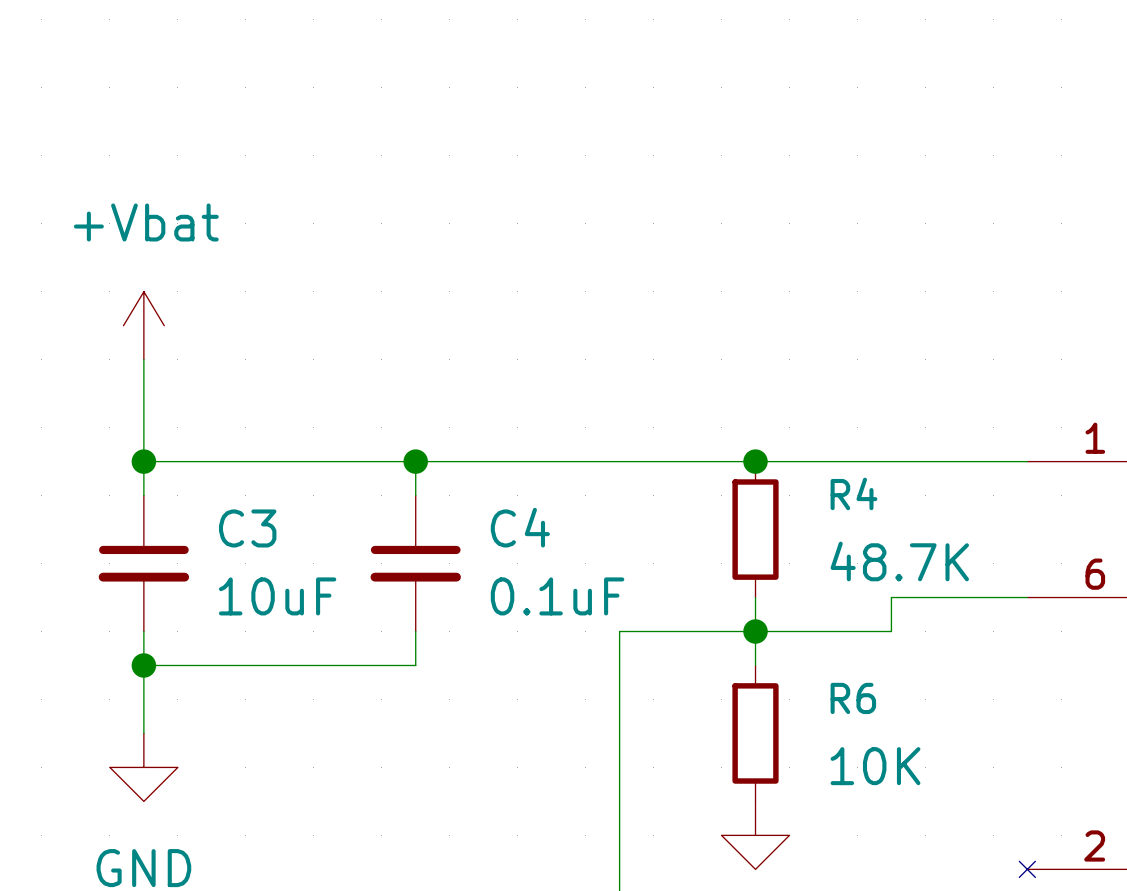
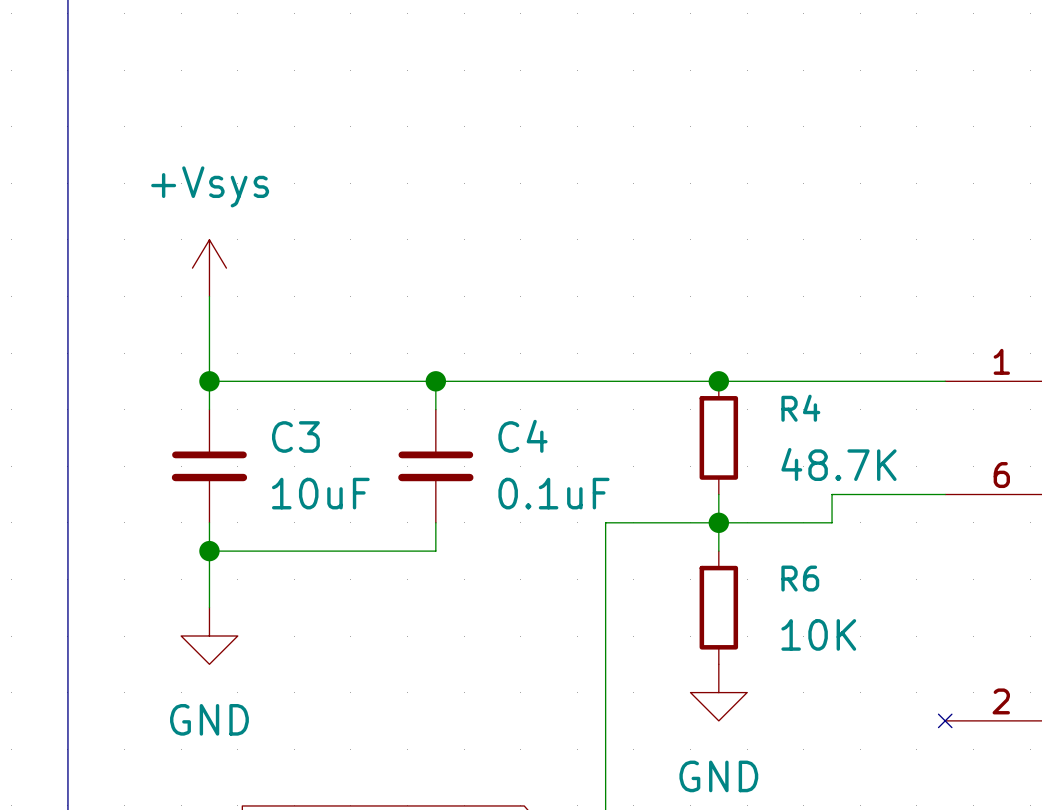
power symbol: +Vbat (143, 325) -> +Vsys (209, 268)

